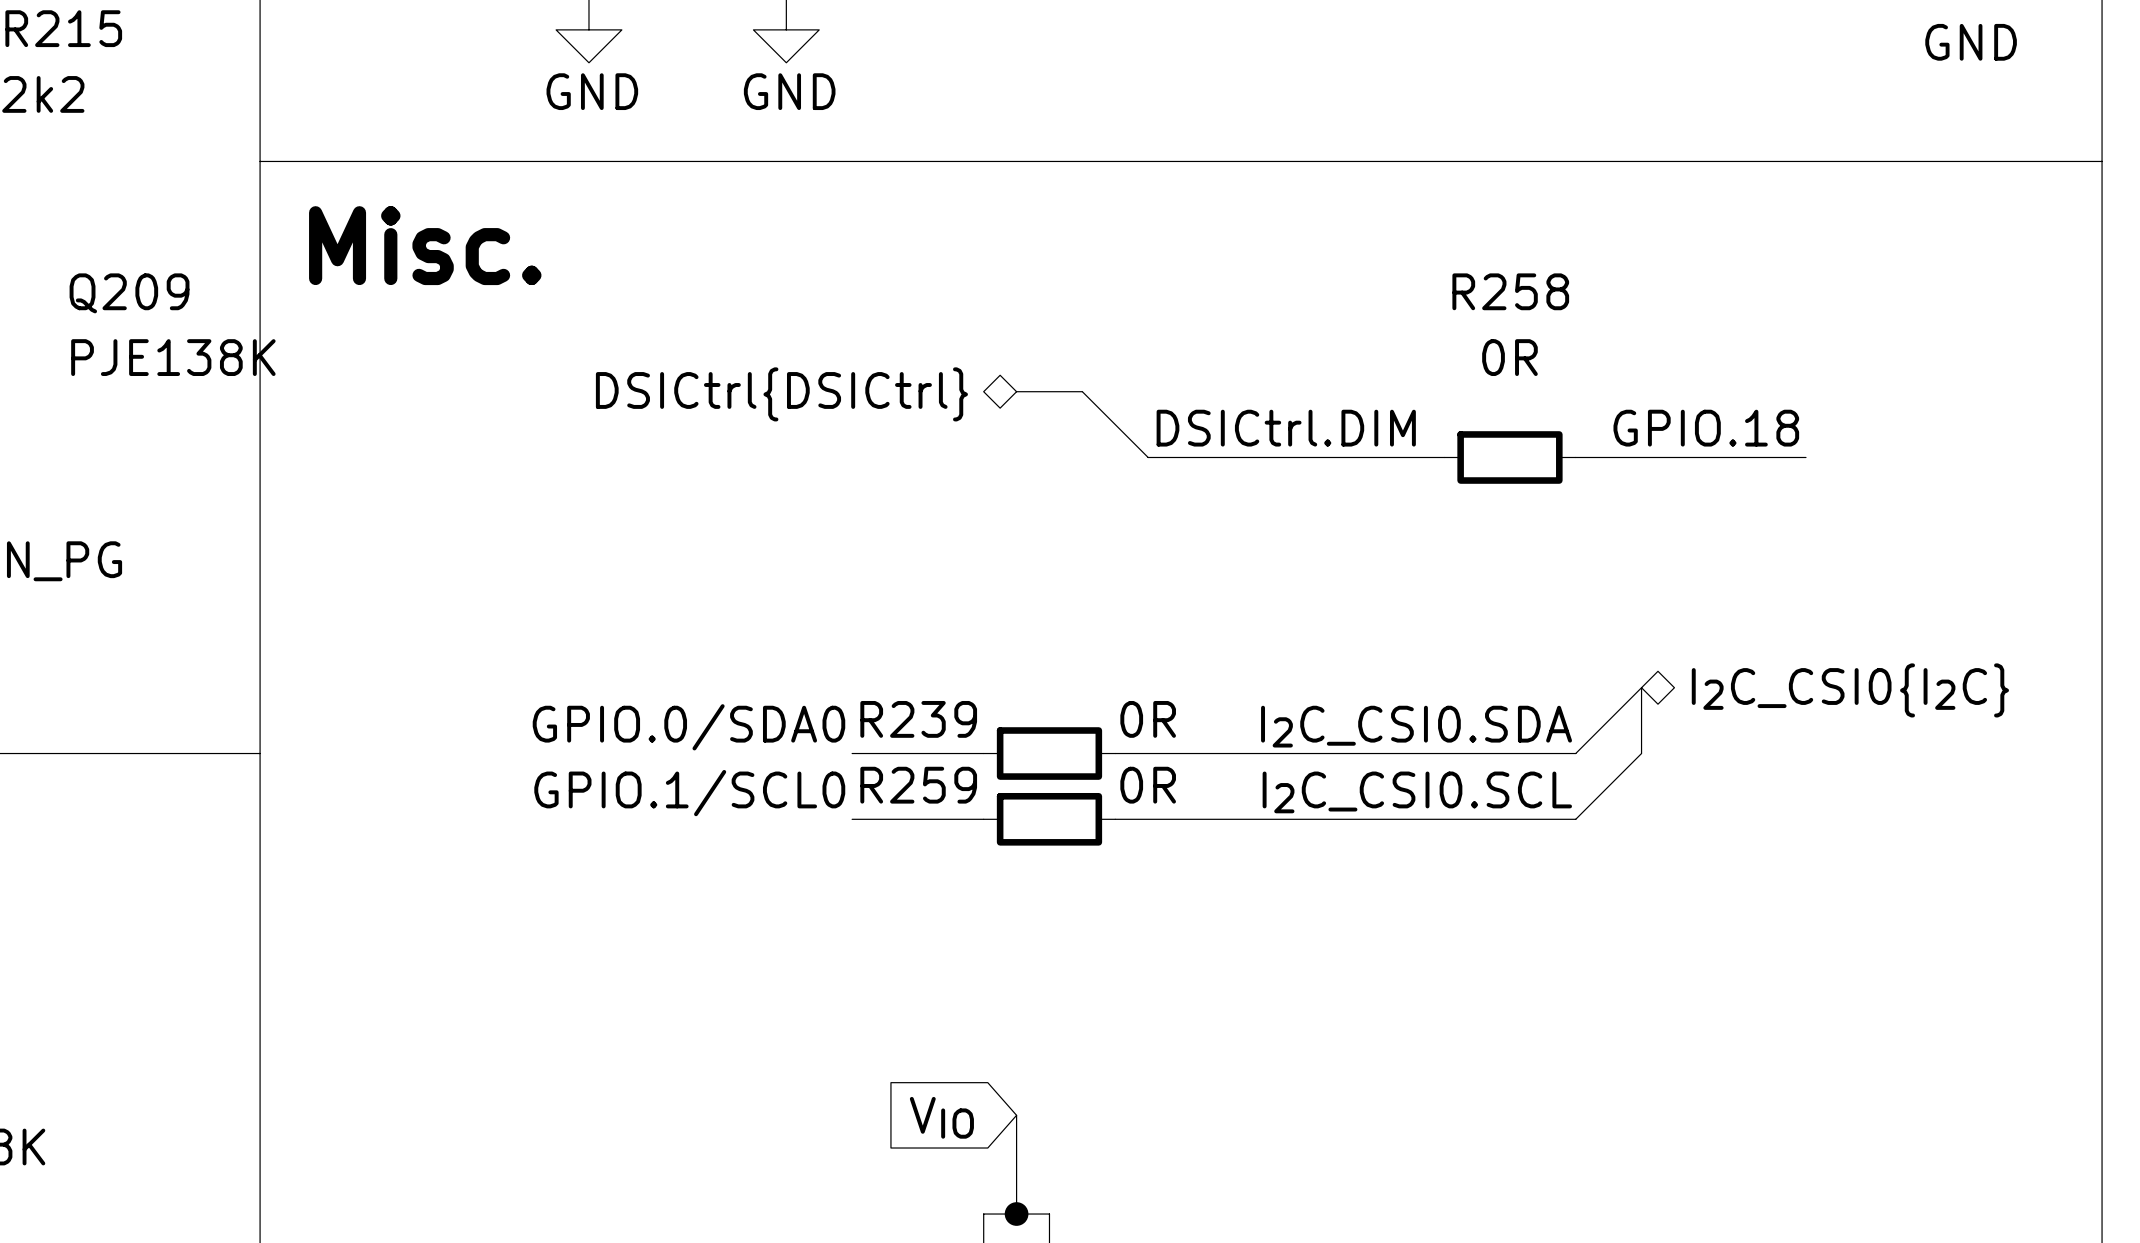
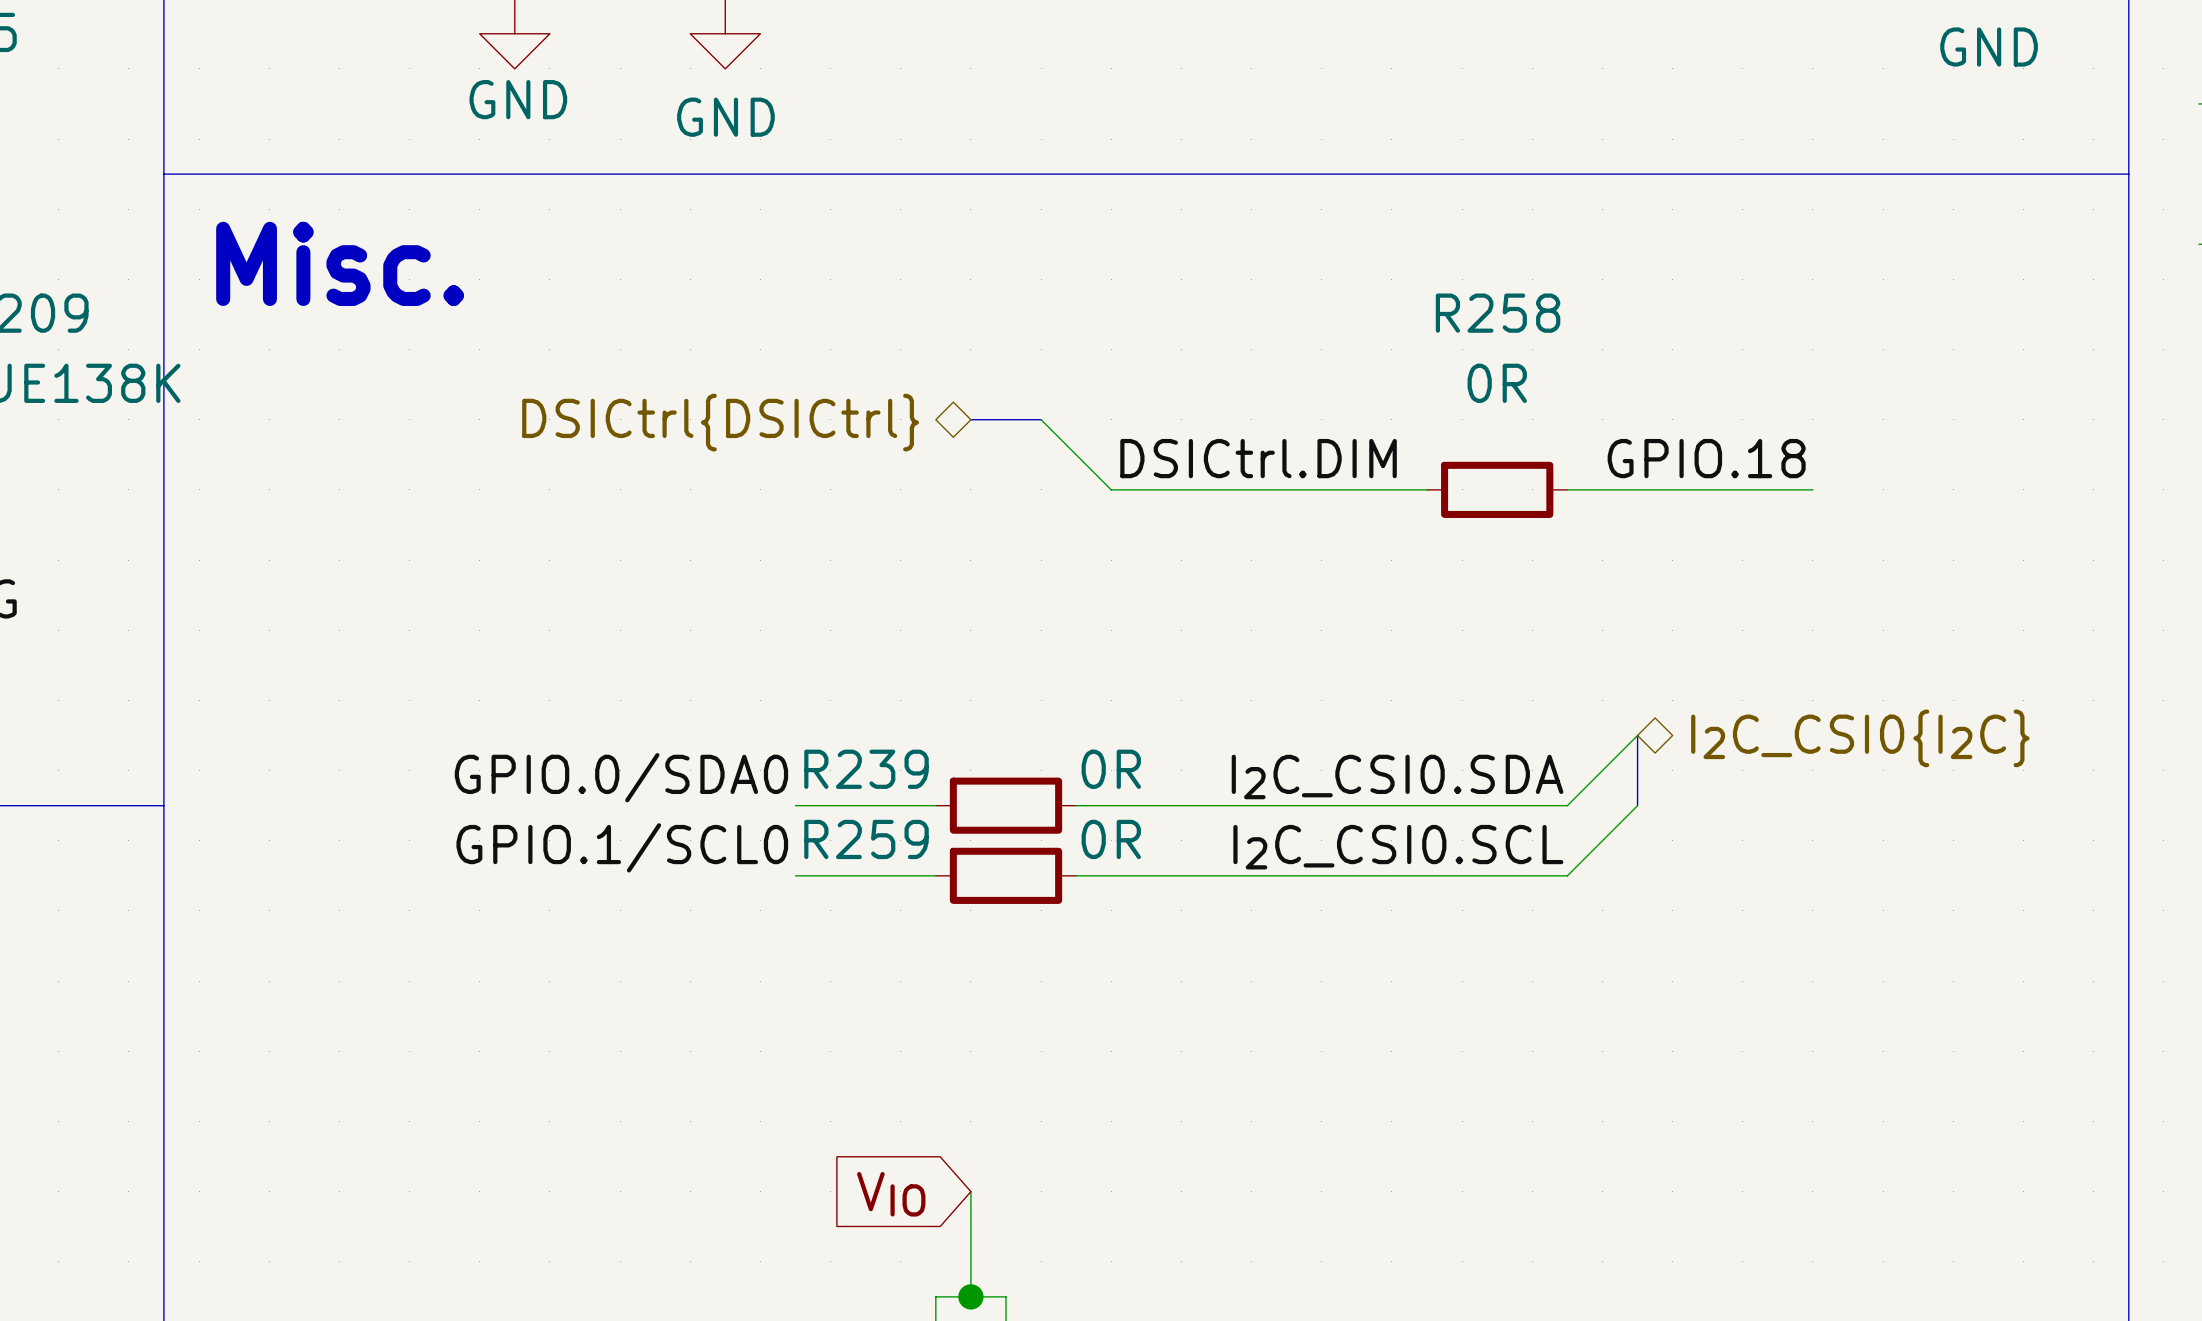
power symbol text position: GND (789, 91) -> GND (725, 117)

